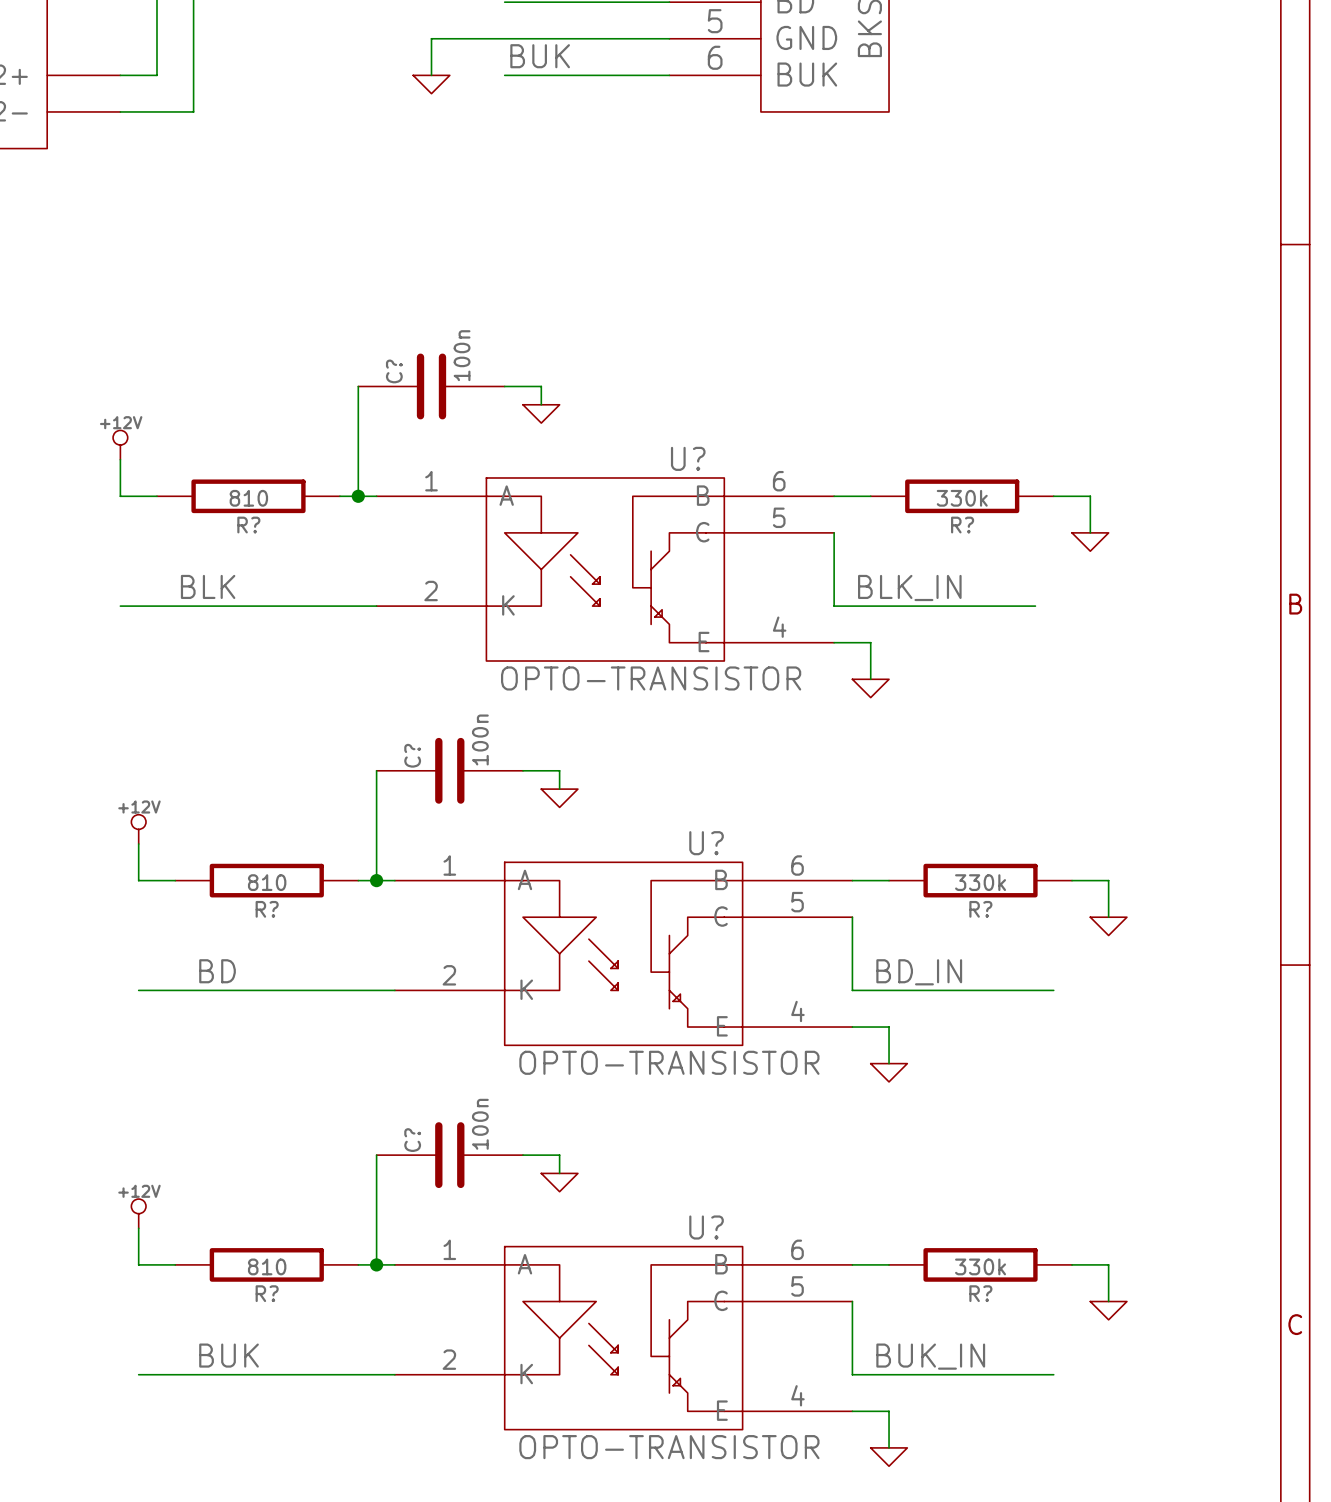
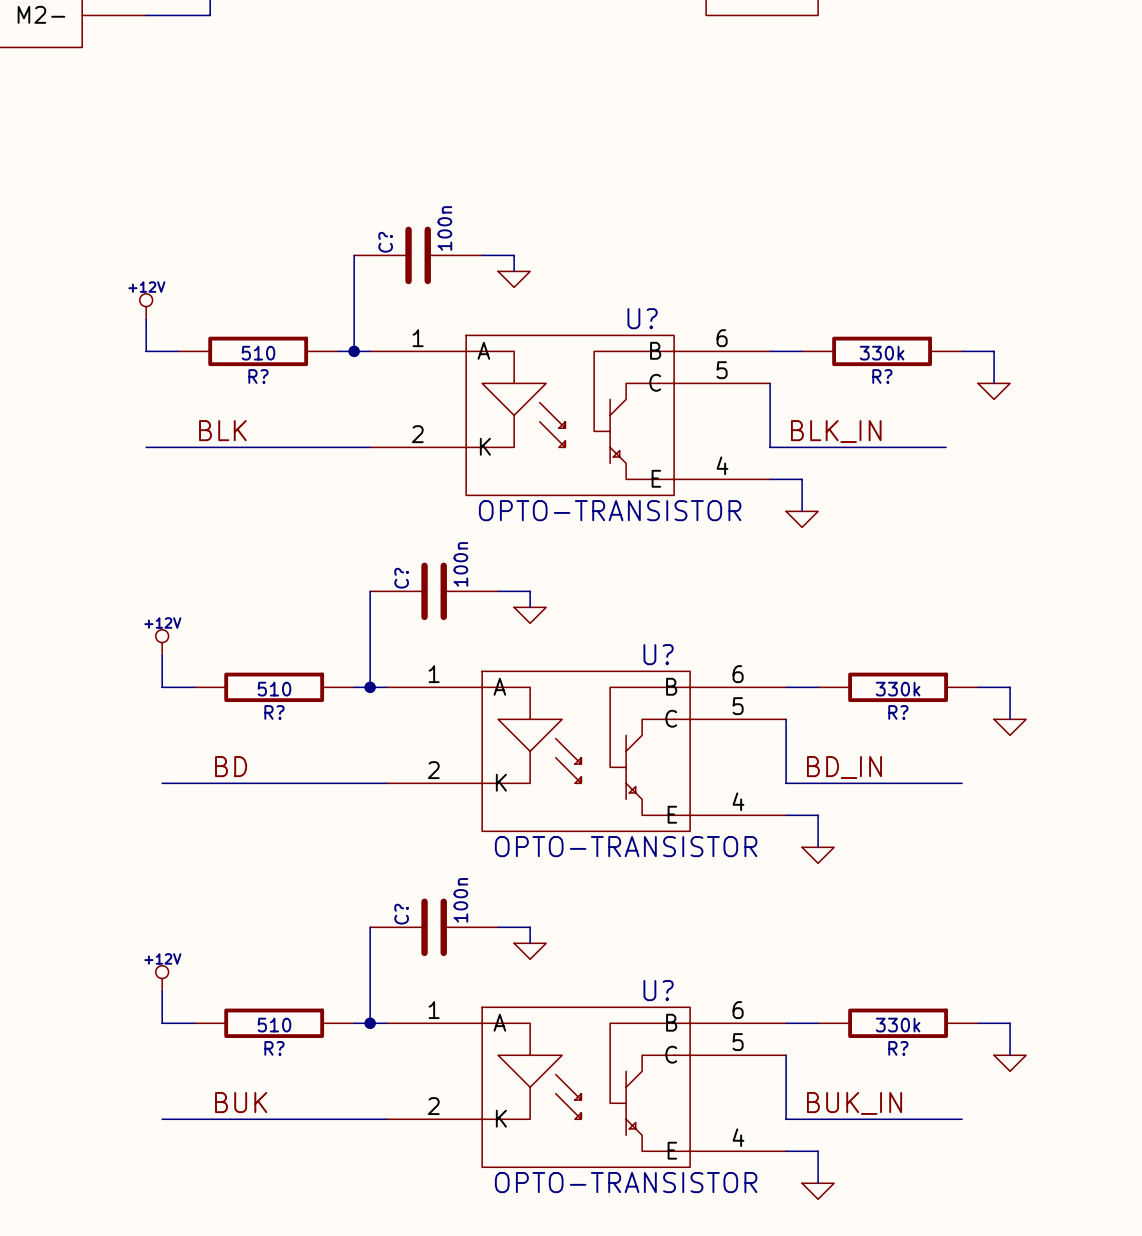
R? value: 810 (248, 498) -> 510 (258, 353)
R? value: 810 (267, 882) -> 510 (274, 689)
R? value: 810 (267, 1266) -> 510 (274, 1025)

